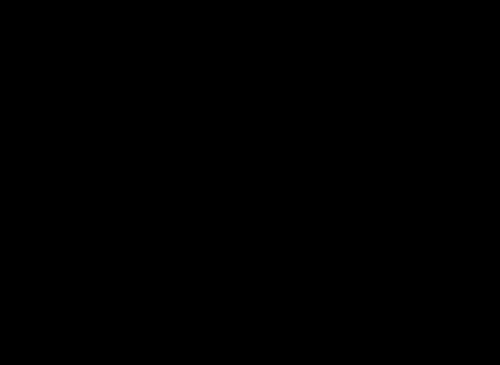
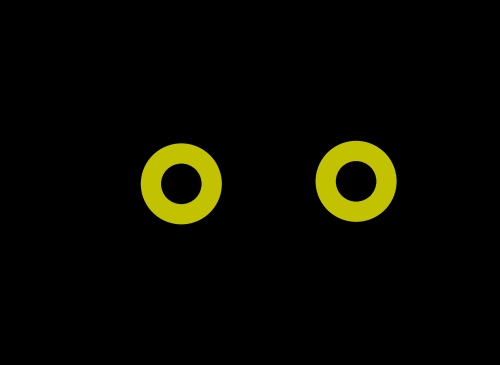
part: none -> (356, 181)
part: none -> (181, 183)

